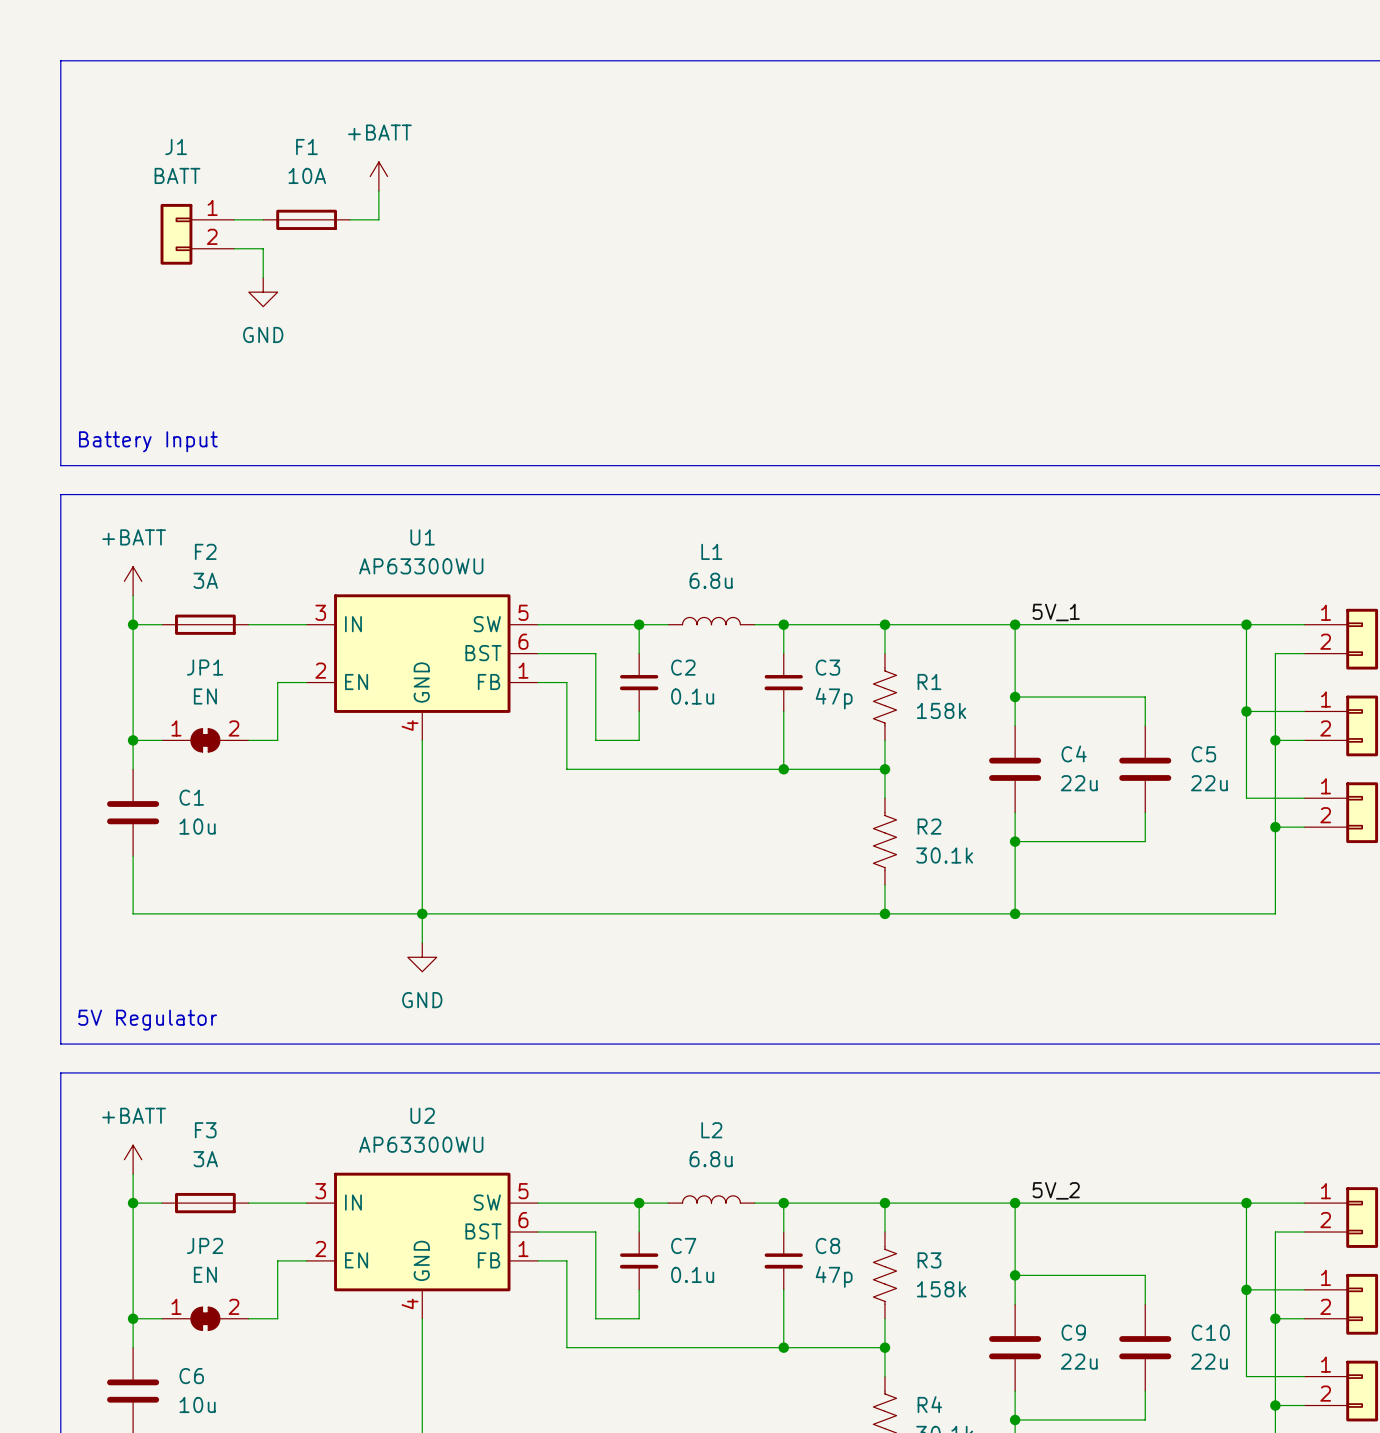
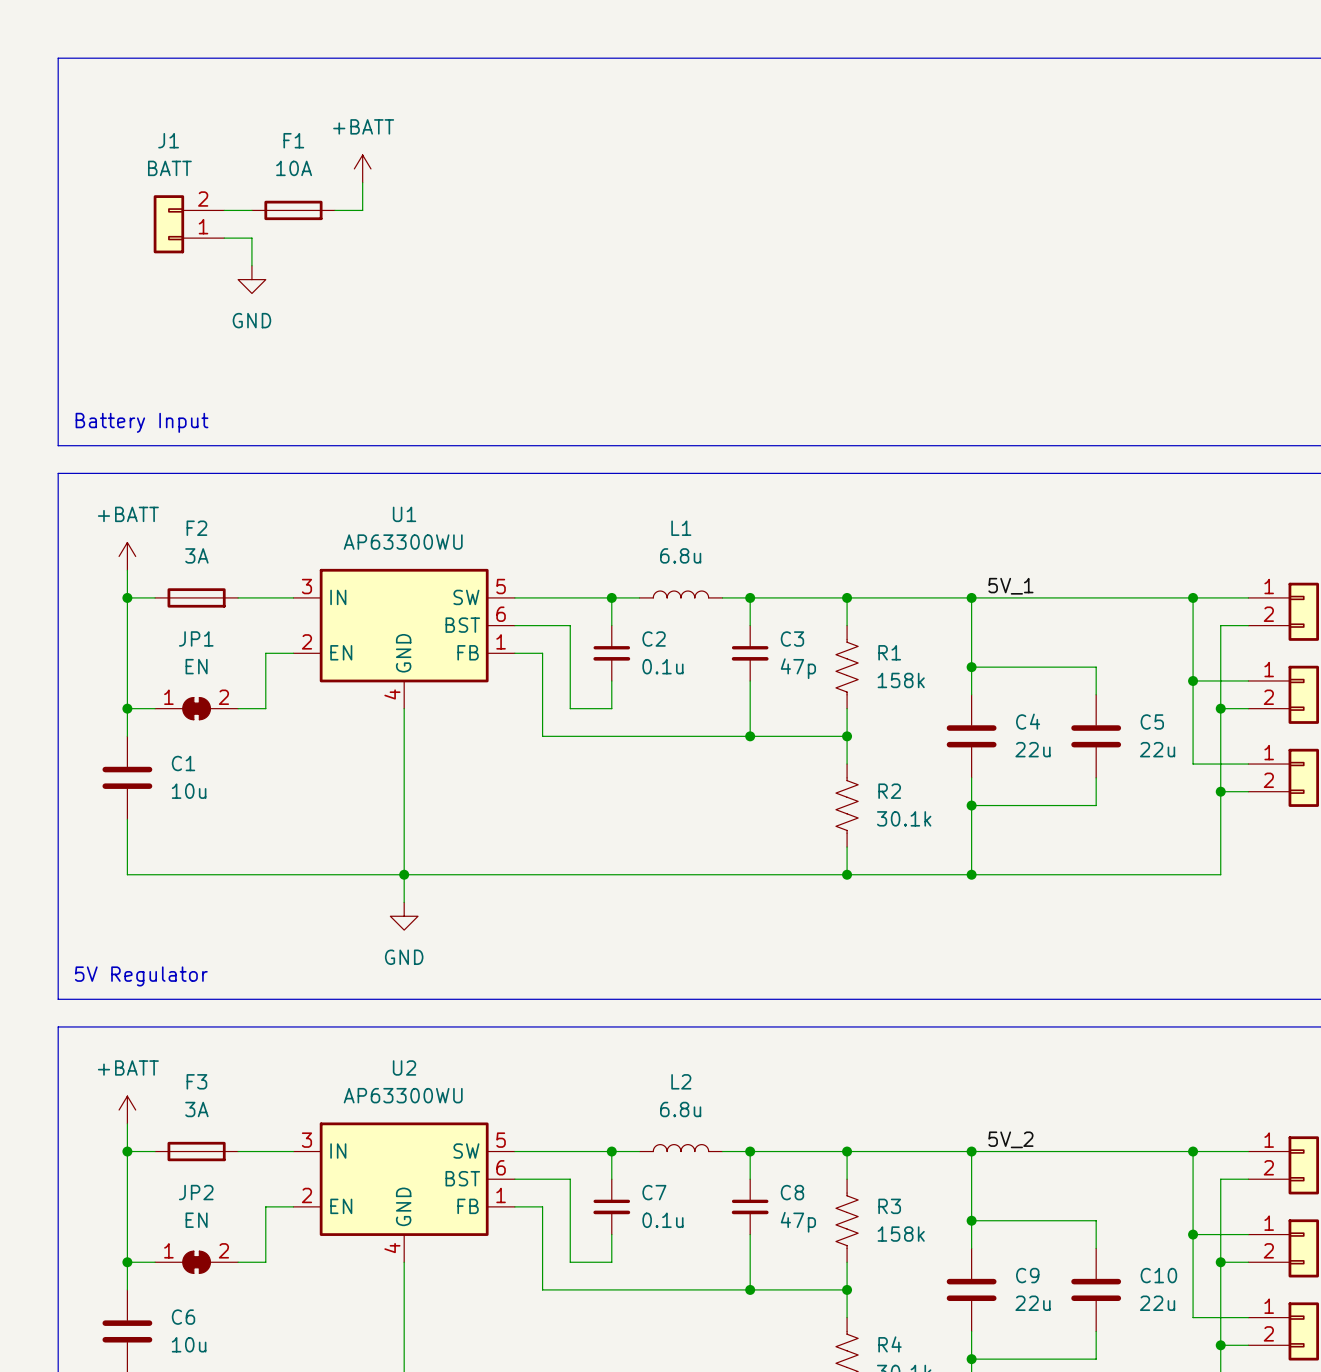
J1 flip: as is (176, 234) -> up-down (168, 224)

